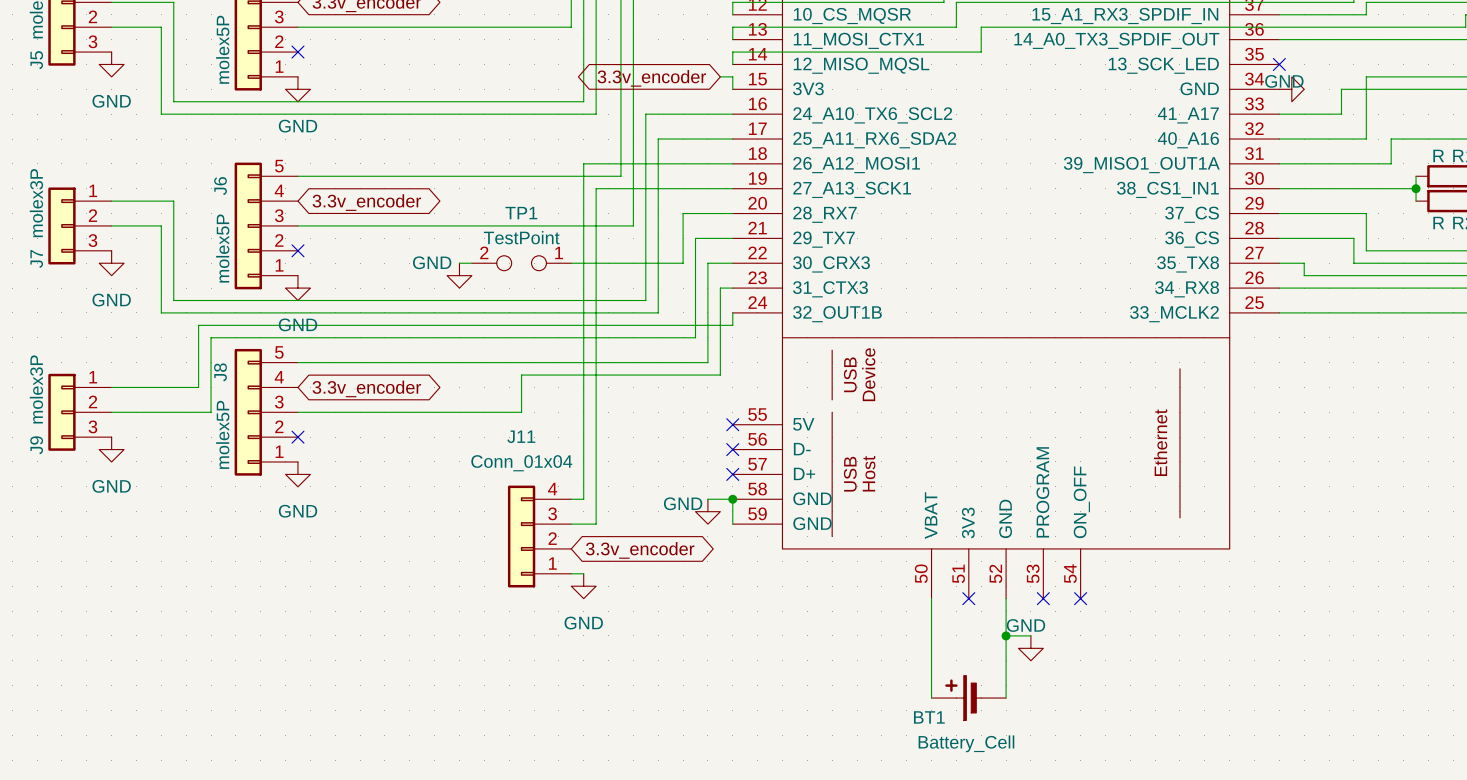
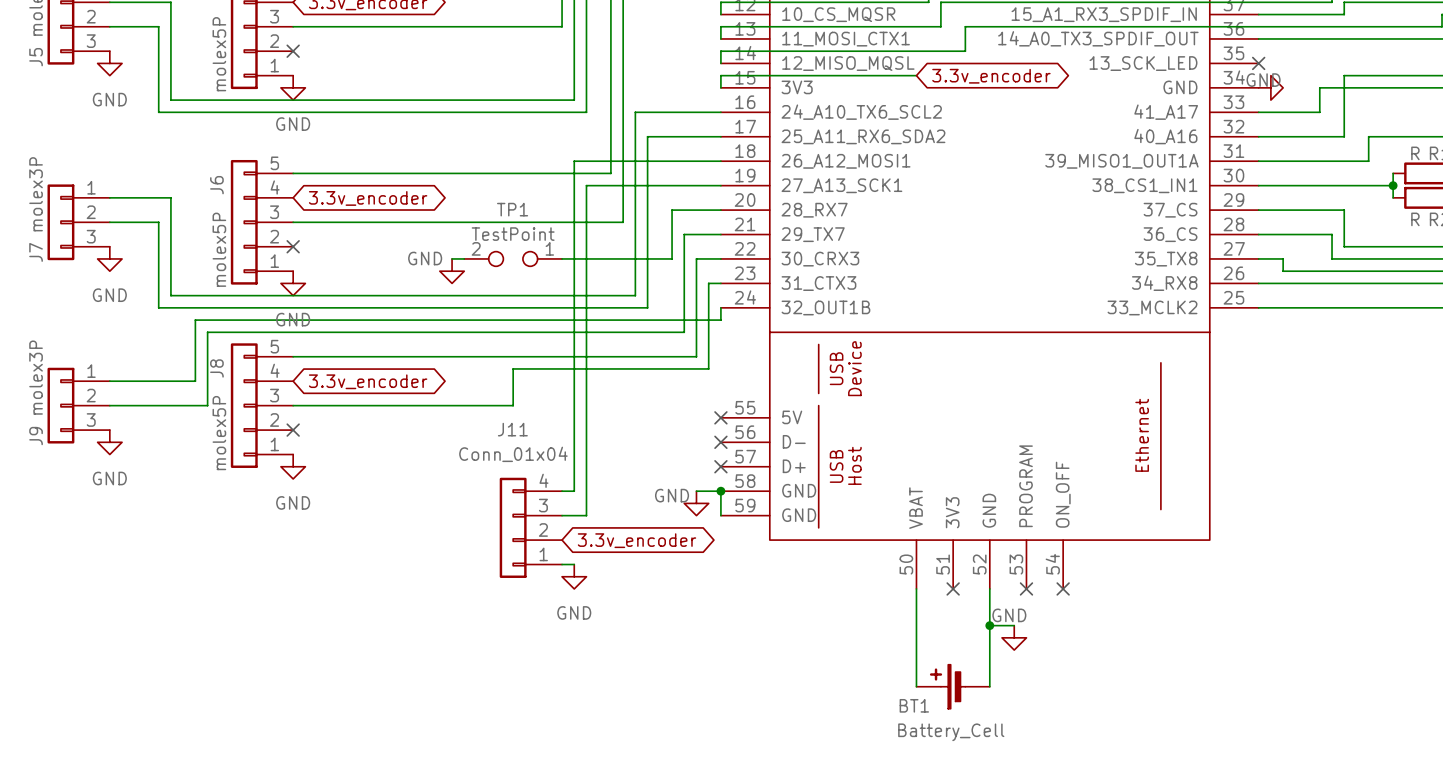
wire: (720, 76) (732, 76) -> (916, 75) (720, 75)
global label rotation: 0° (651, 78) -> 180° (991, 76)
global label position: 3.3v_encoder (651, 78) -> 3.3v_encoder (991, 76)

